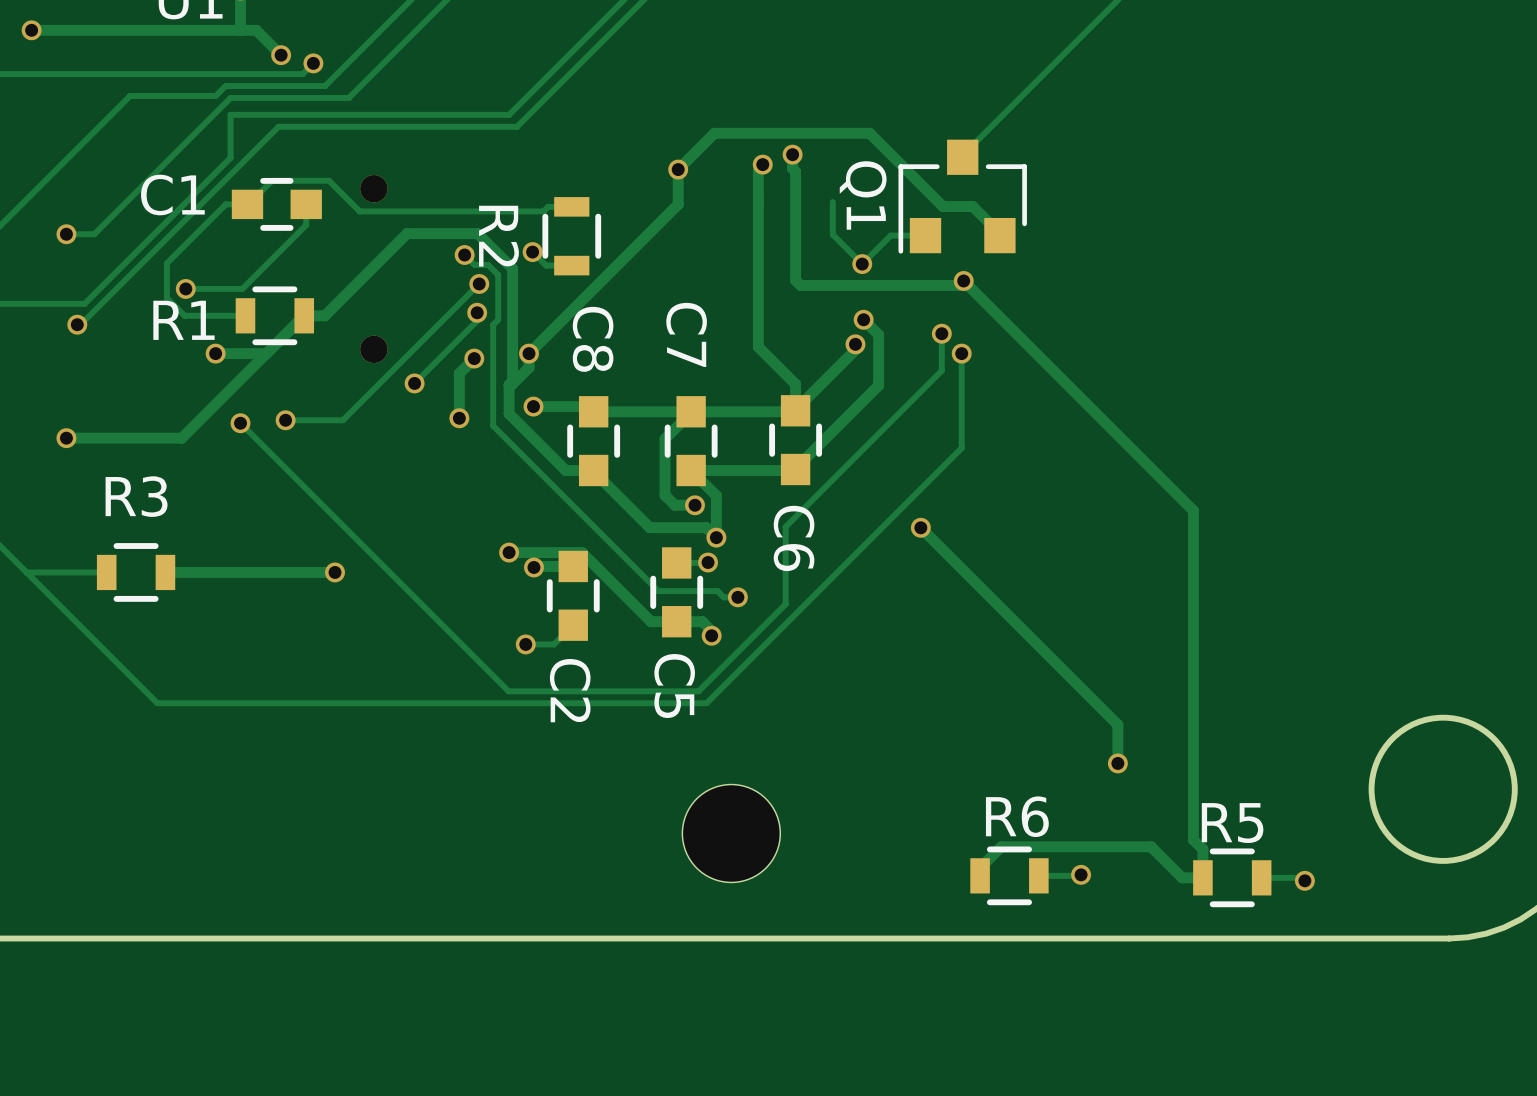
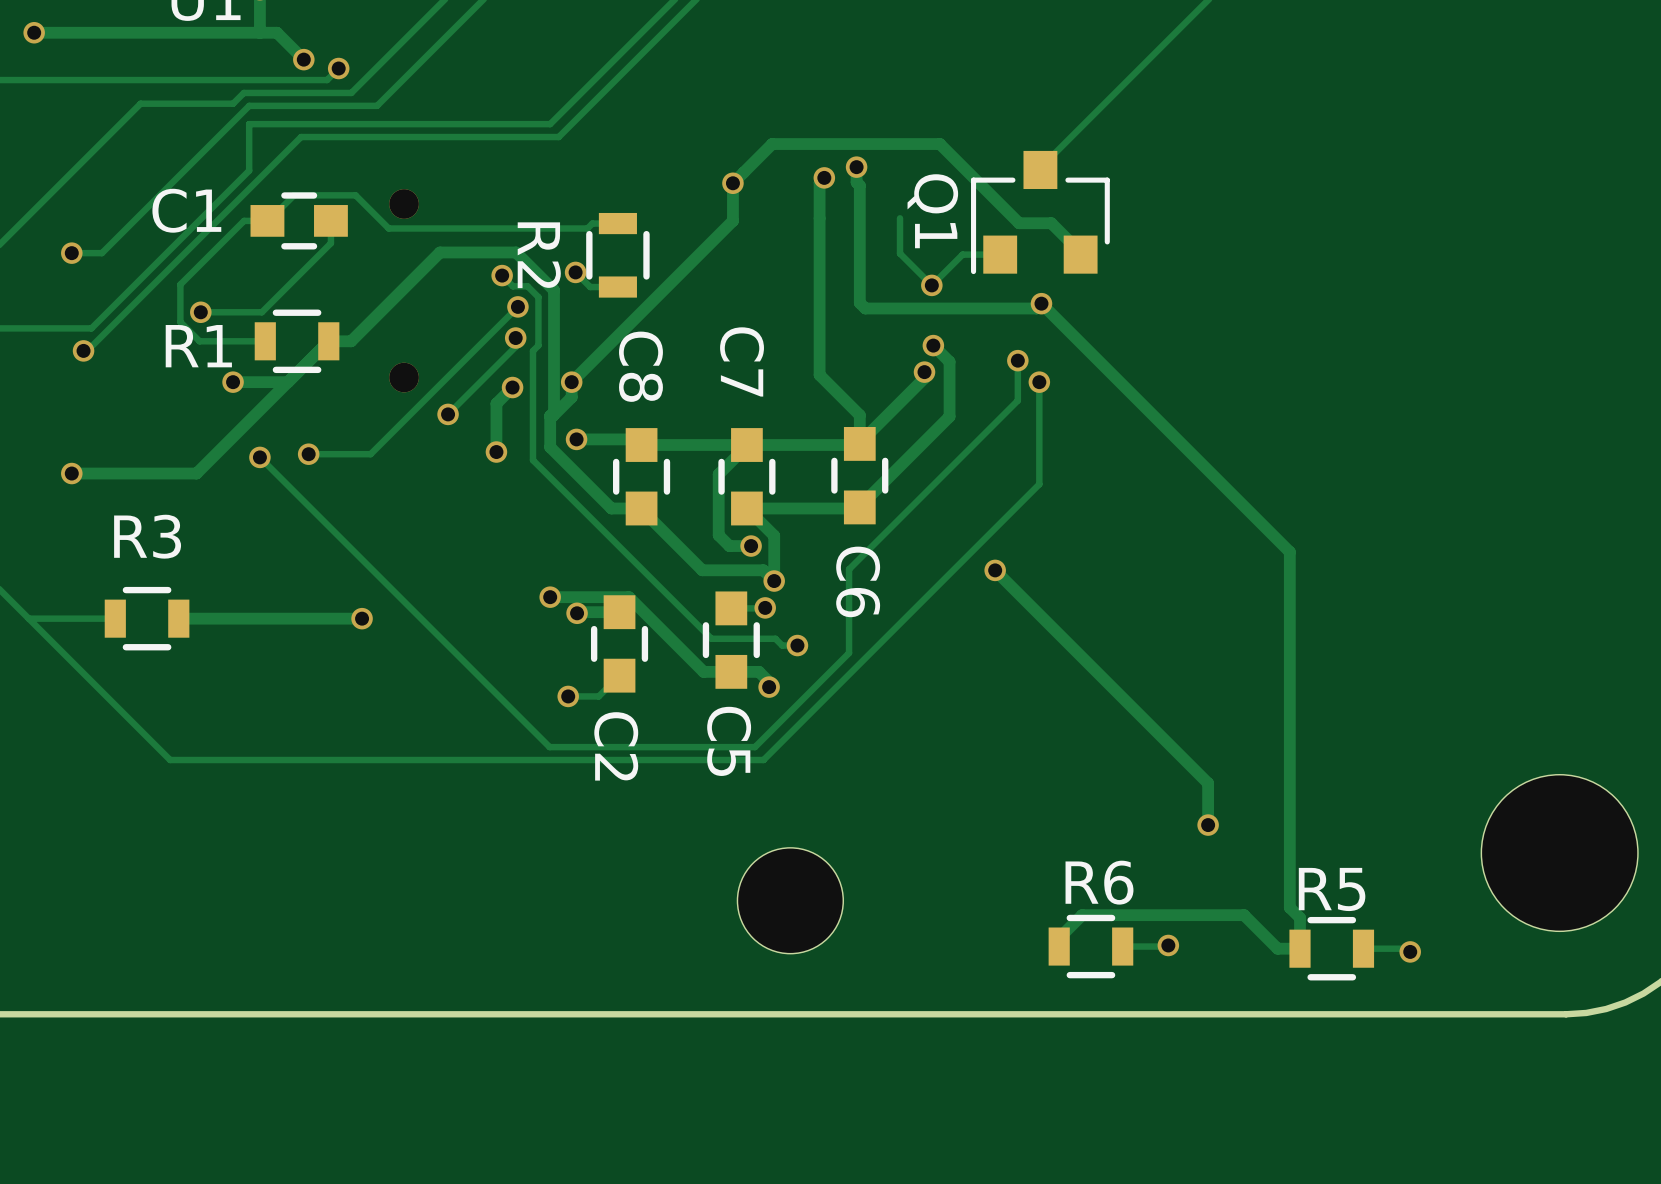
round board edge: [1368, 714, 1518, 864] -> none
part: none -> (1559, 853)

